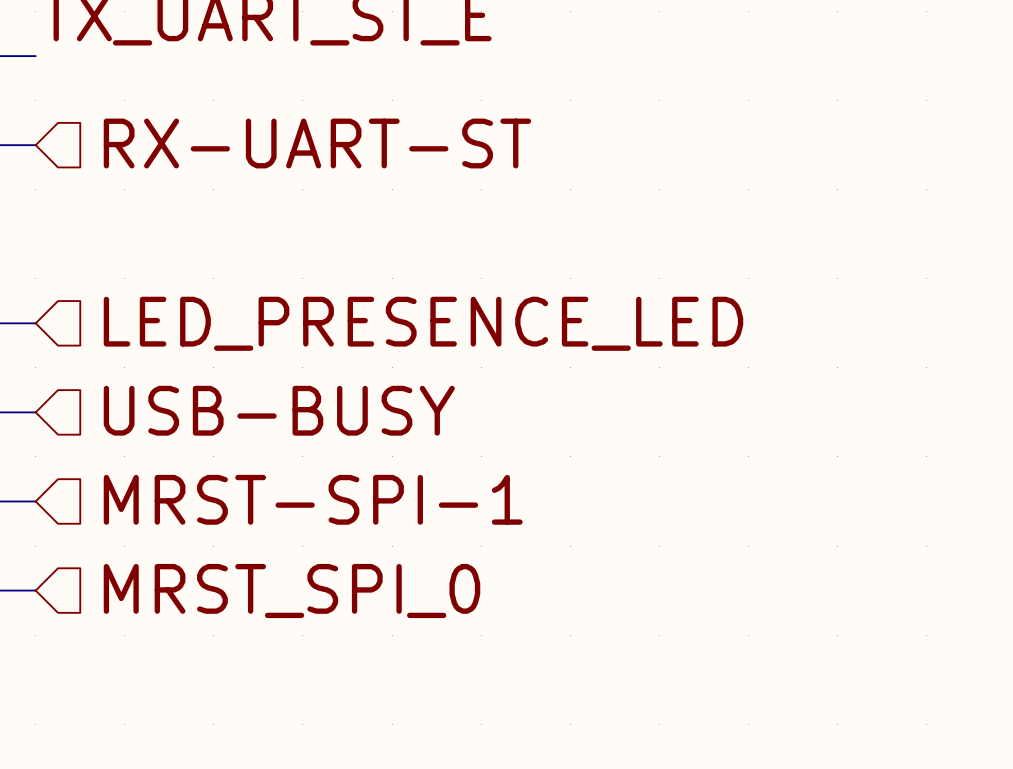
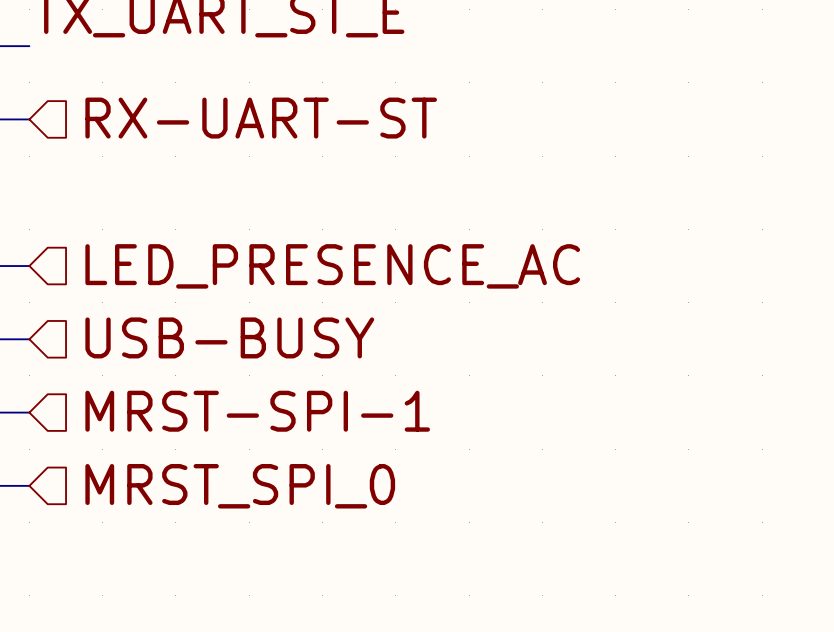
hierarchical label: LED_PRESENCE_LED (423, 323) -> LED_PRESENCE_AC (332, 266)

